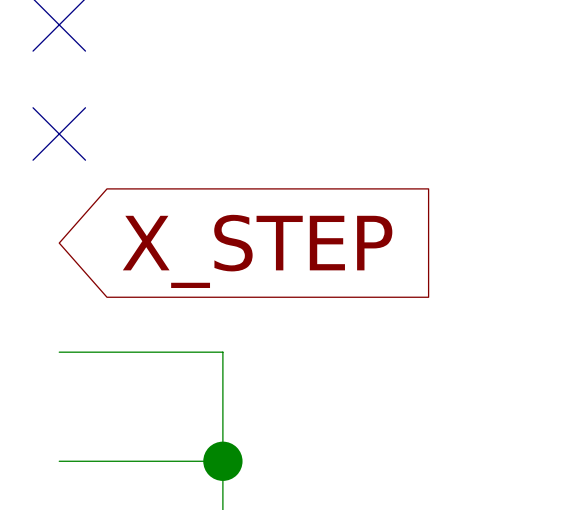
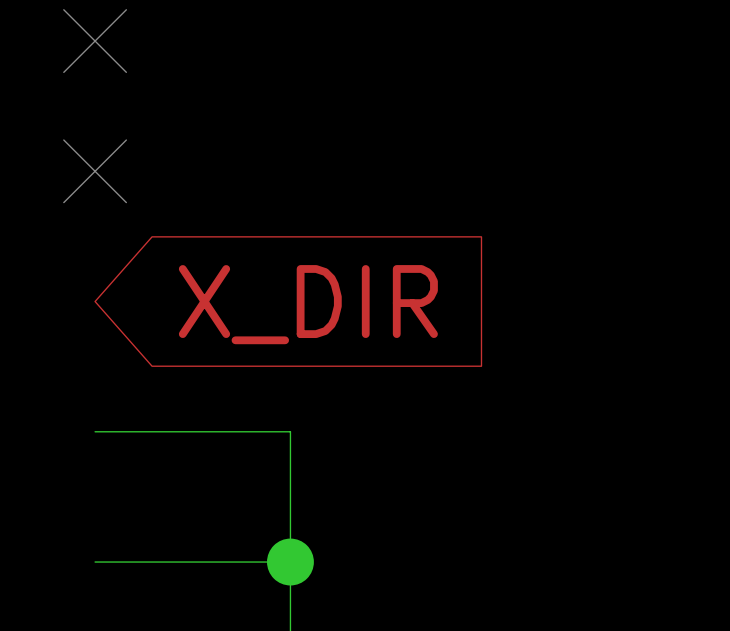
global label: X_STEP (257, 251) -> X_DIR (308, 304)

